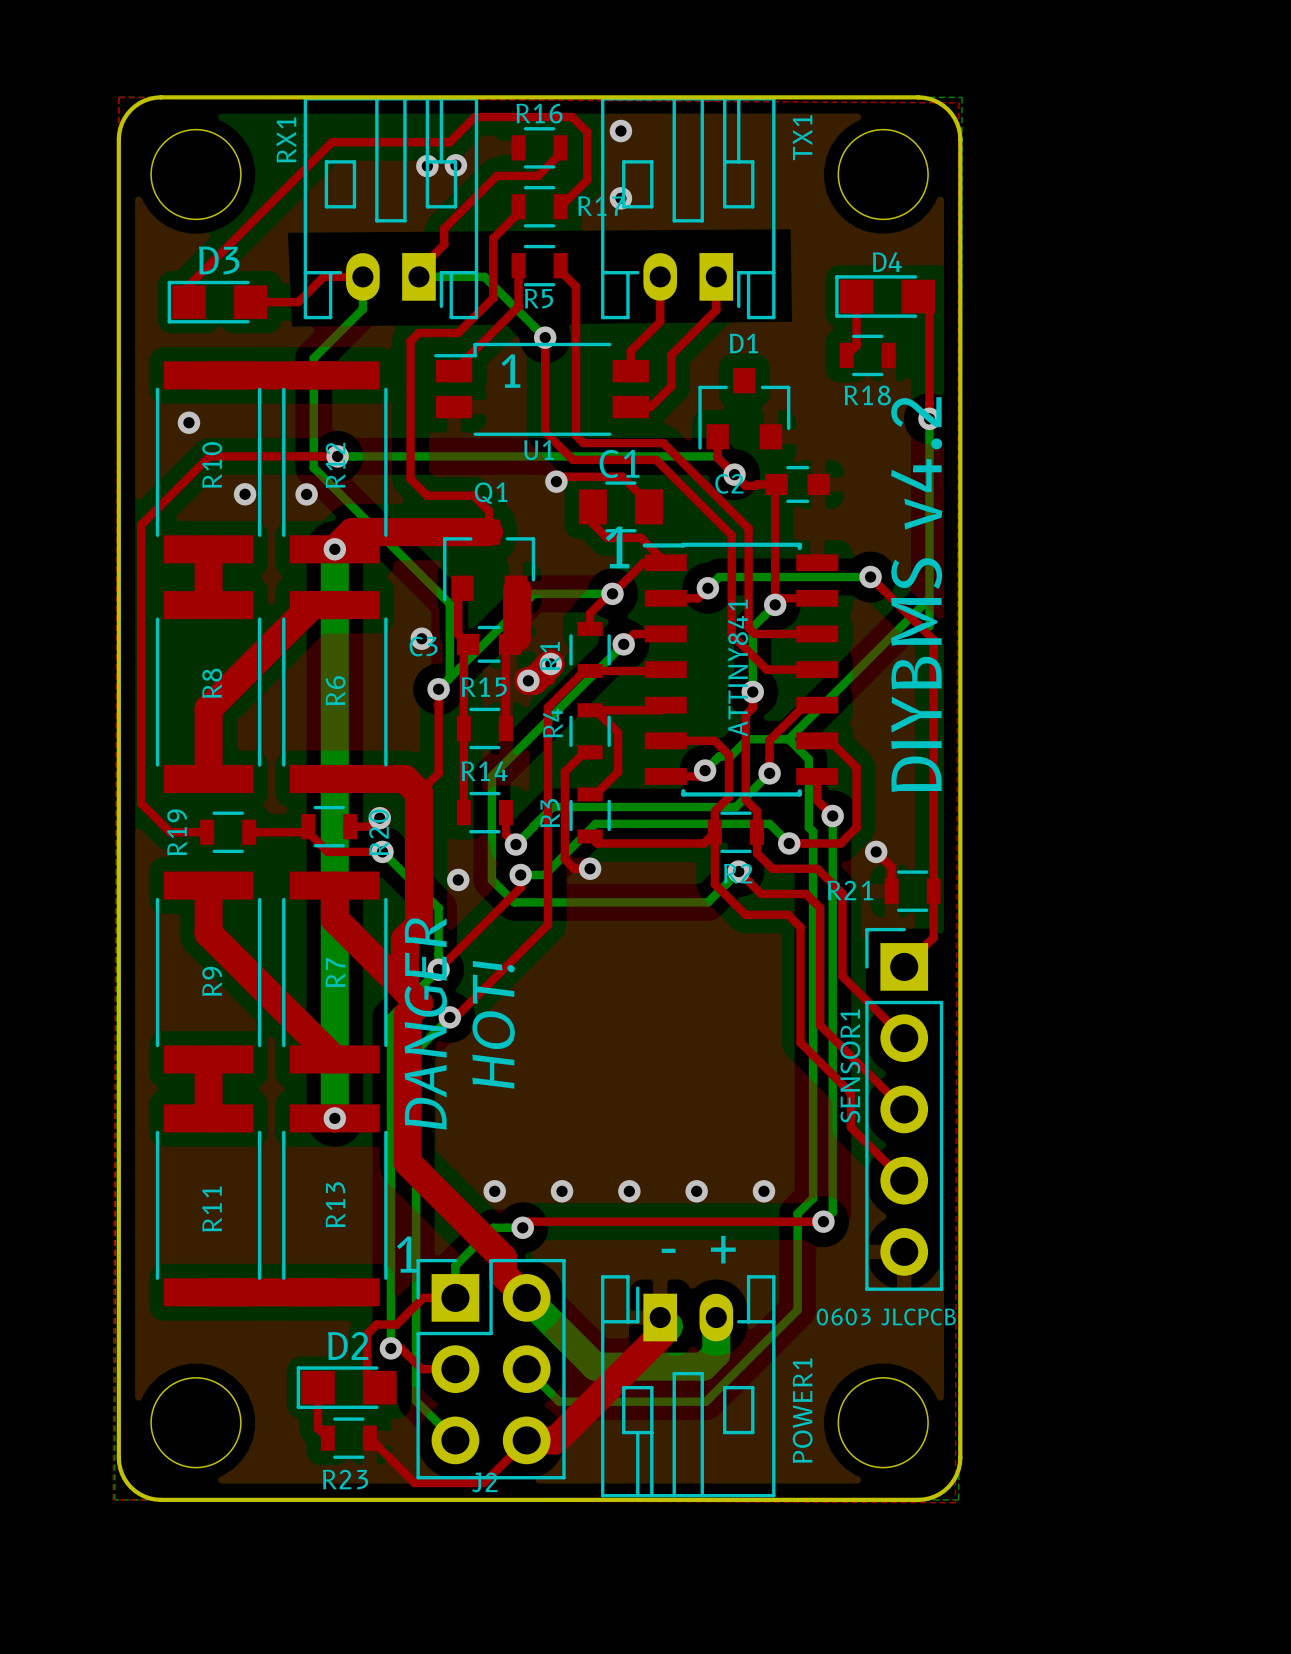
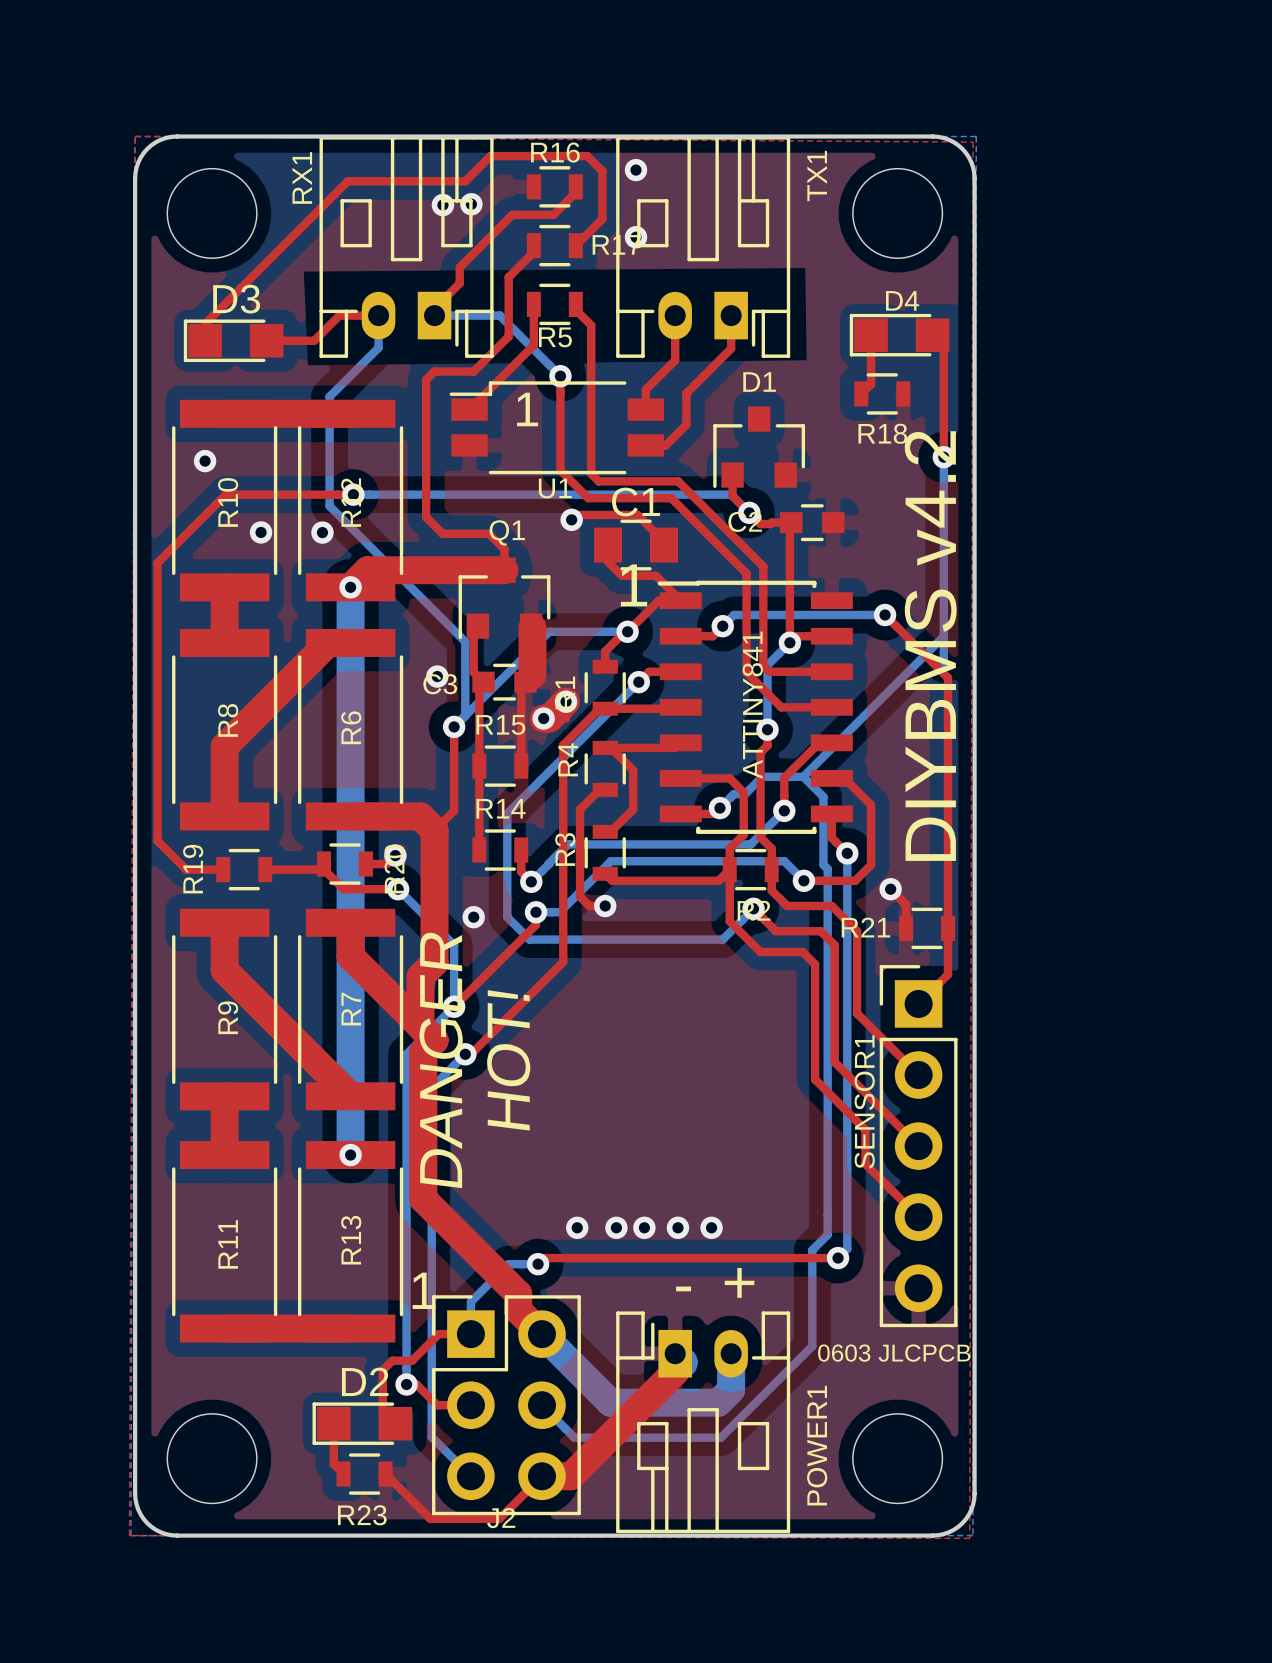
via: (494, 1191) -> none
via: none -> (616, 1227)
via: none -> (677, 1227)
via: (763, 1191) -> none

